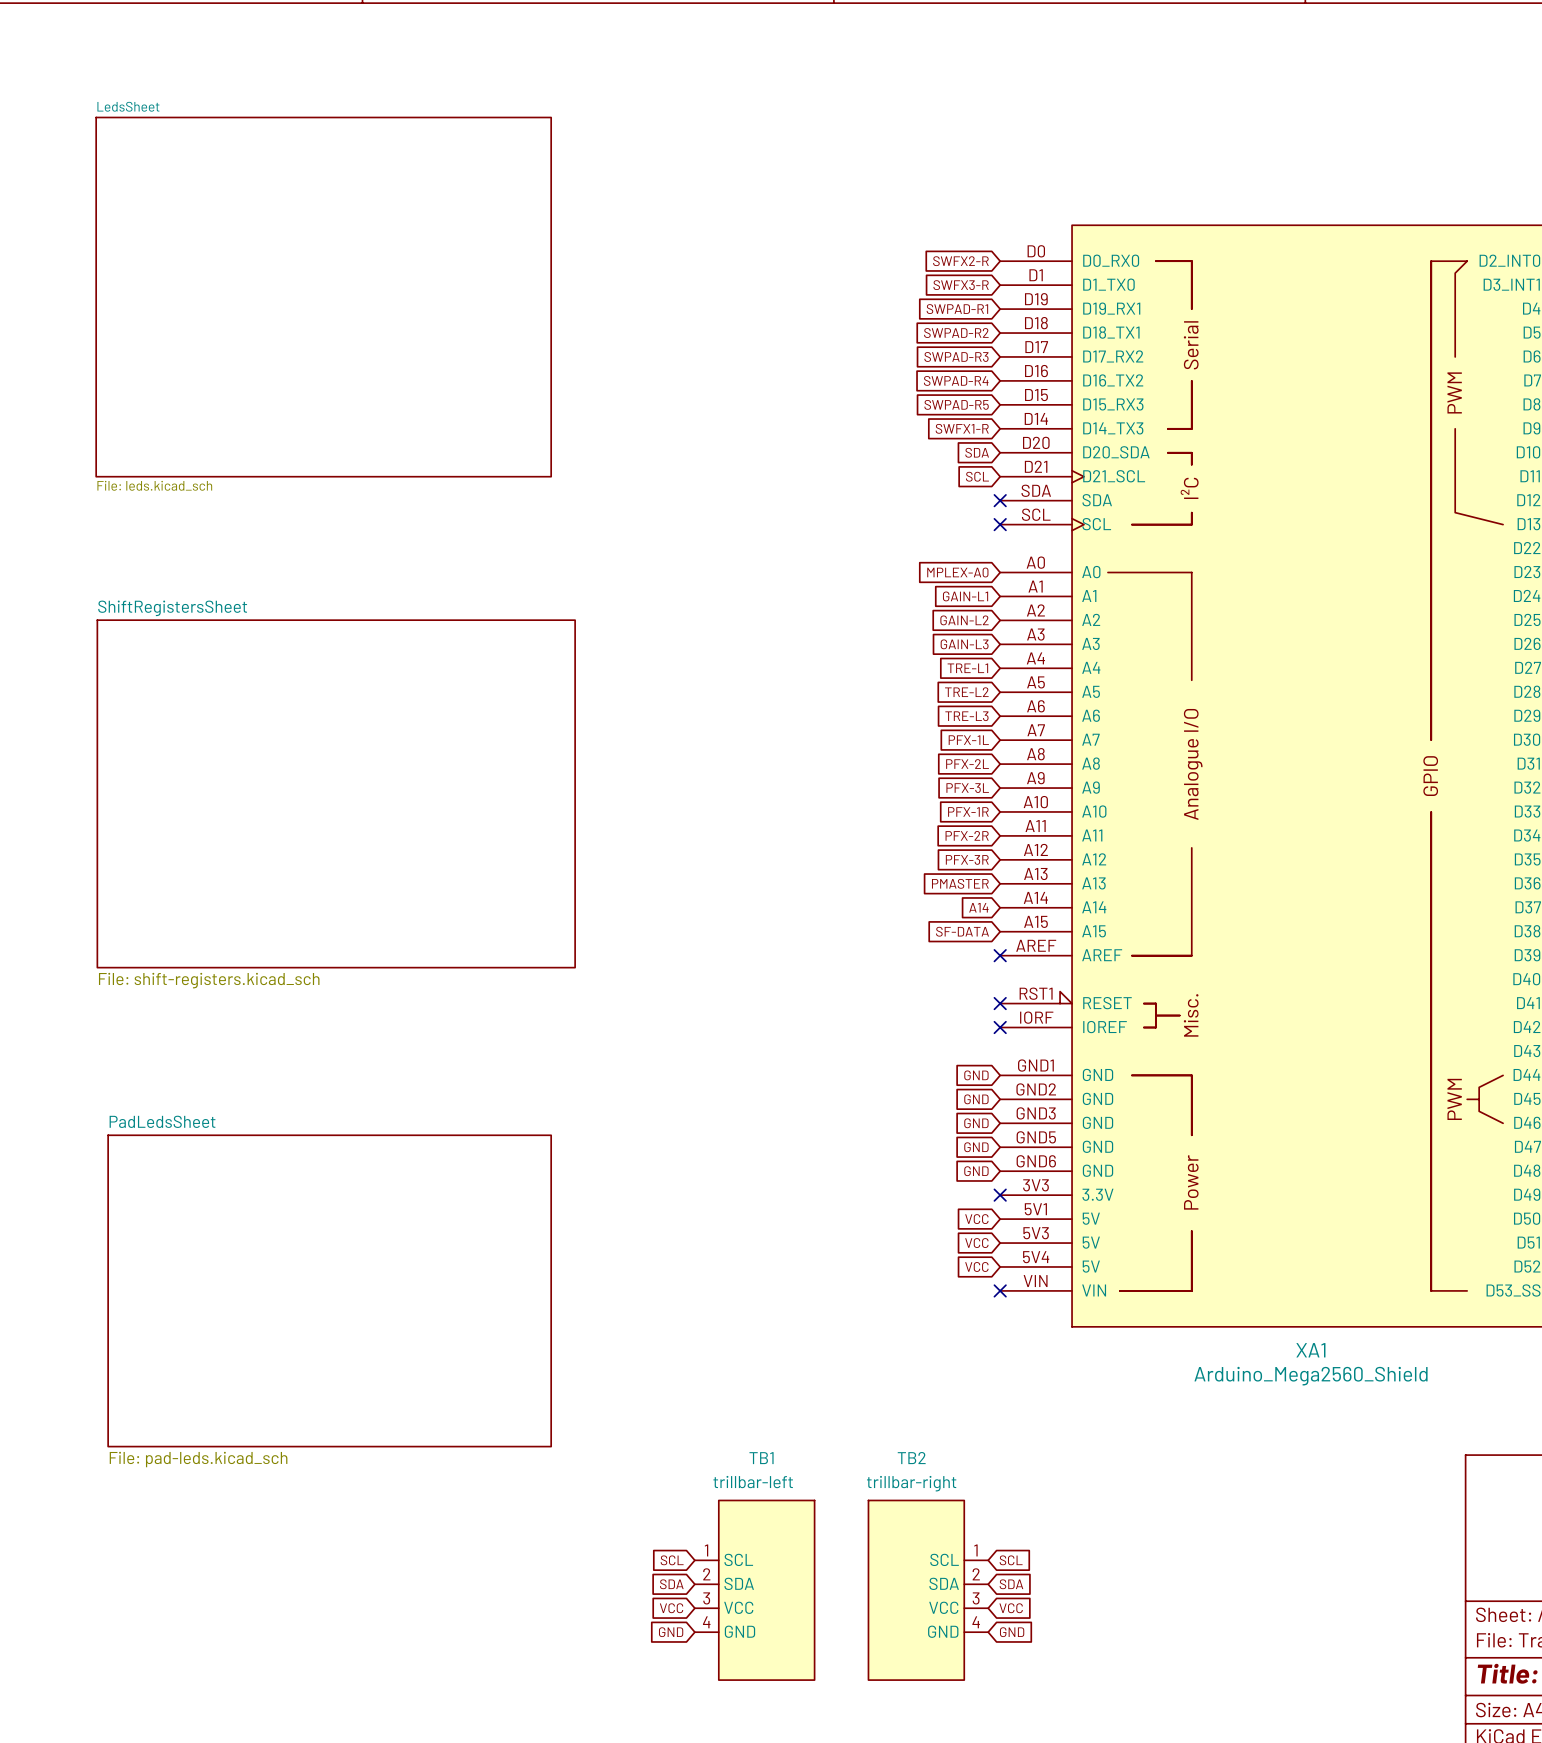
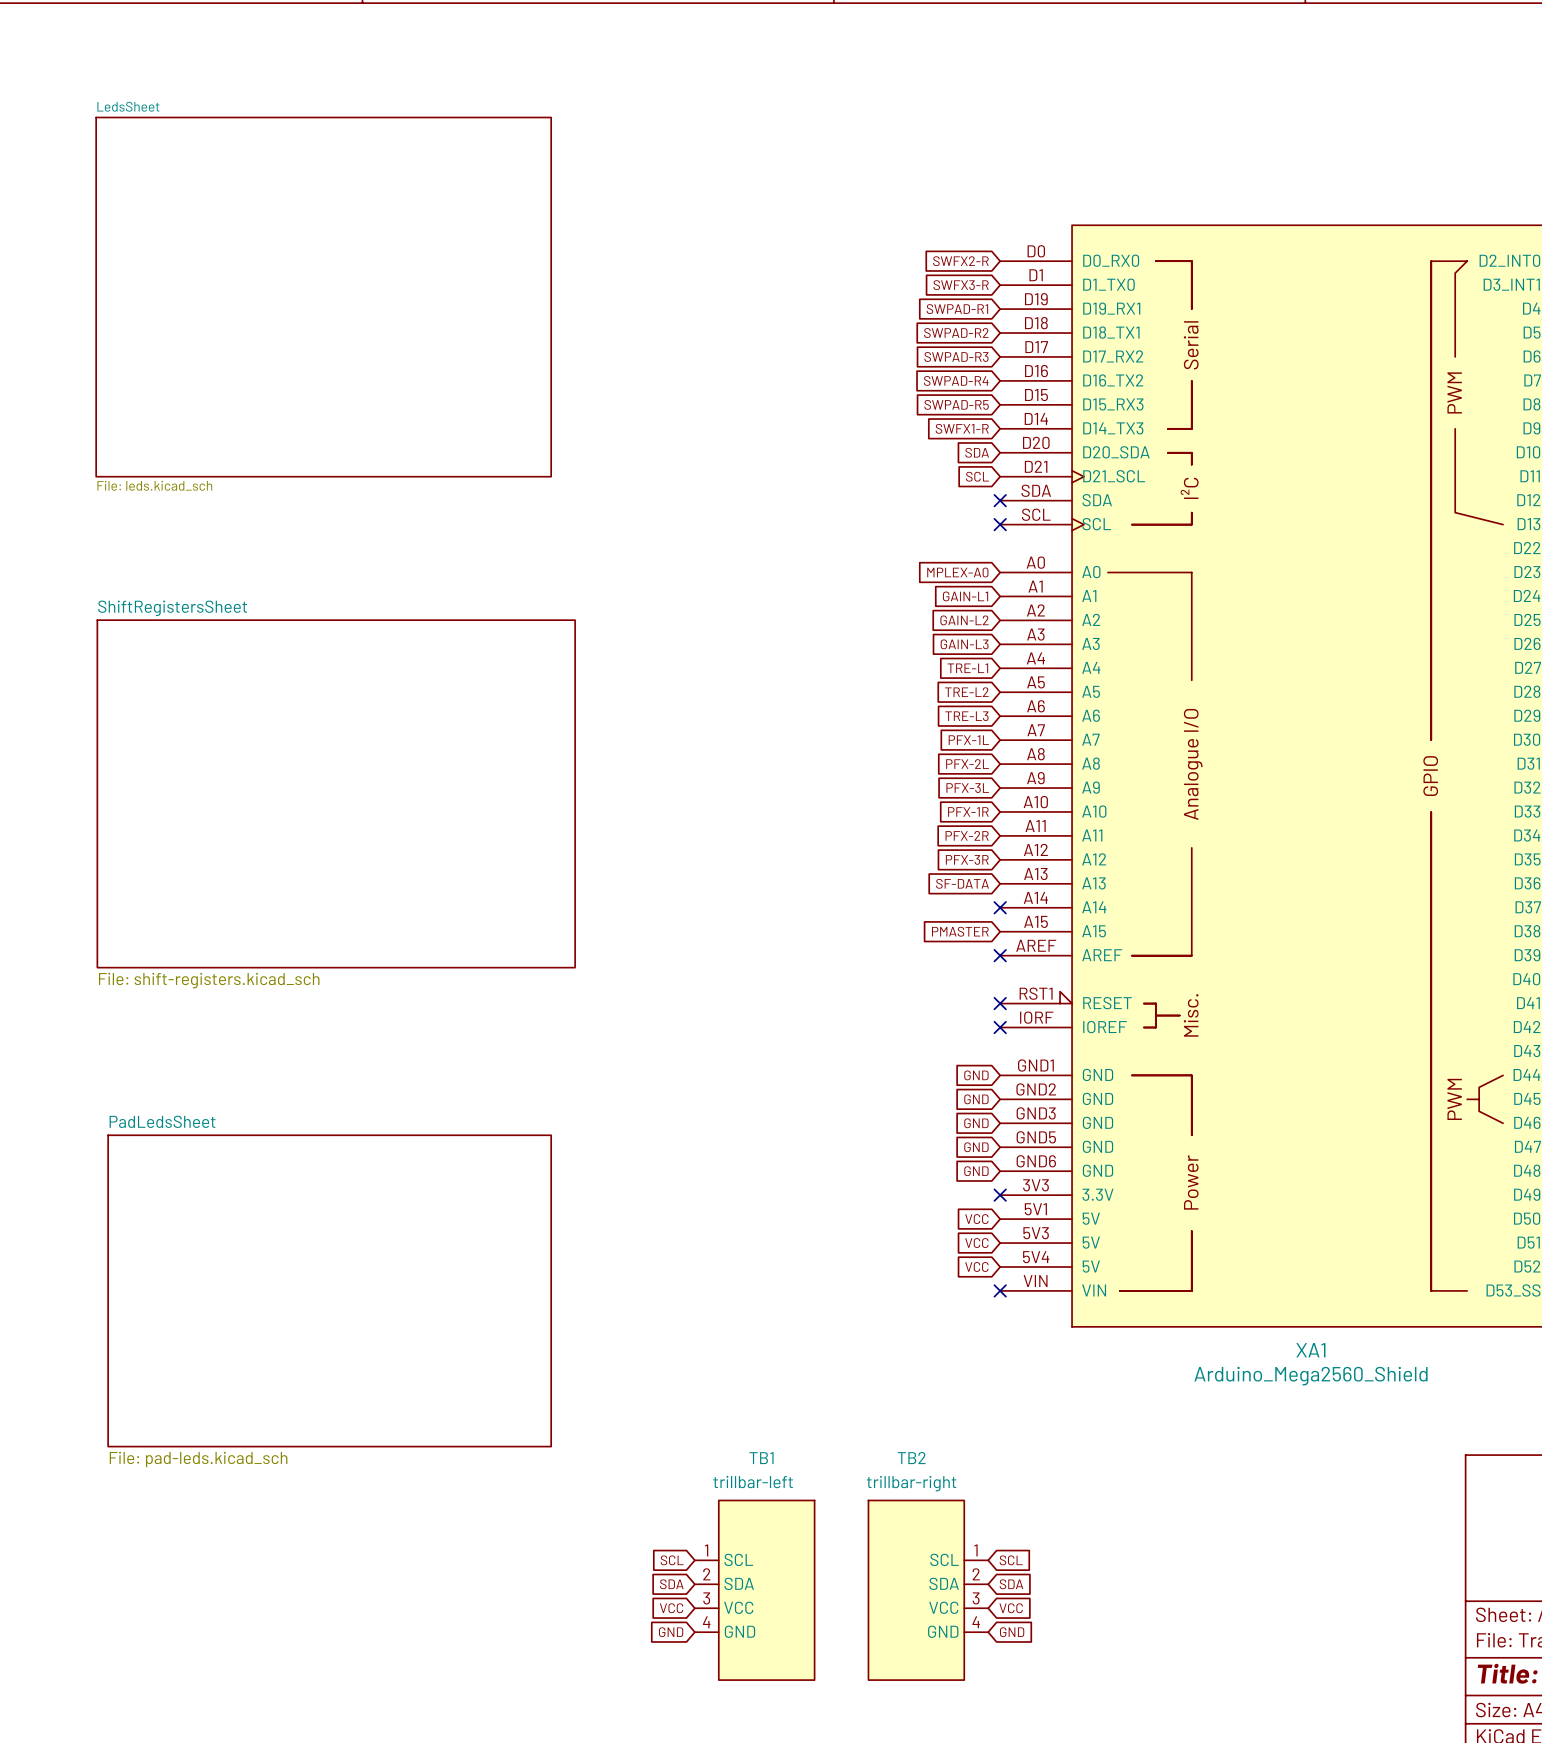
global label: PMASTER (960, 883) -> SF-DATA (962, 883)
global label: A14 (978, 907) -> none
no-connect mark: none -> (1000, 907)
global label: SF-DATA (962, 931) -> PMASTER (960, 931)

